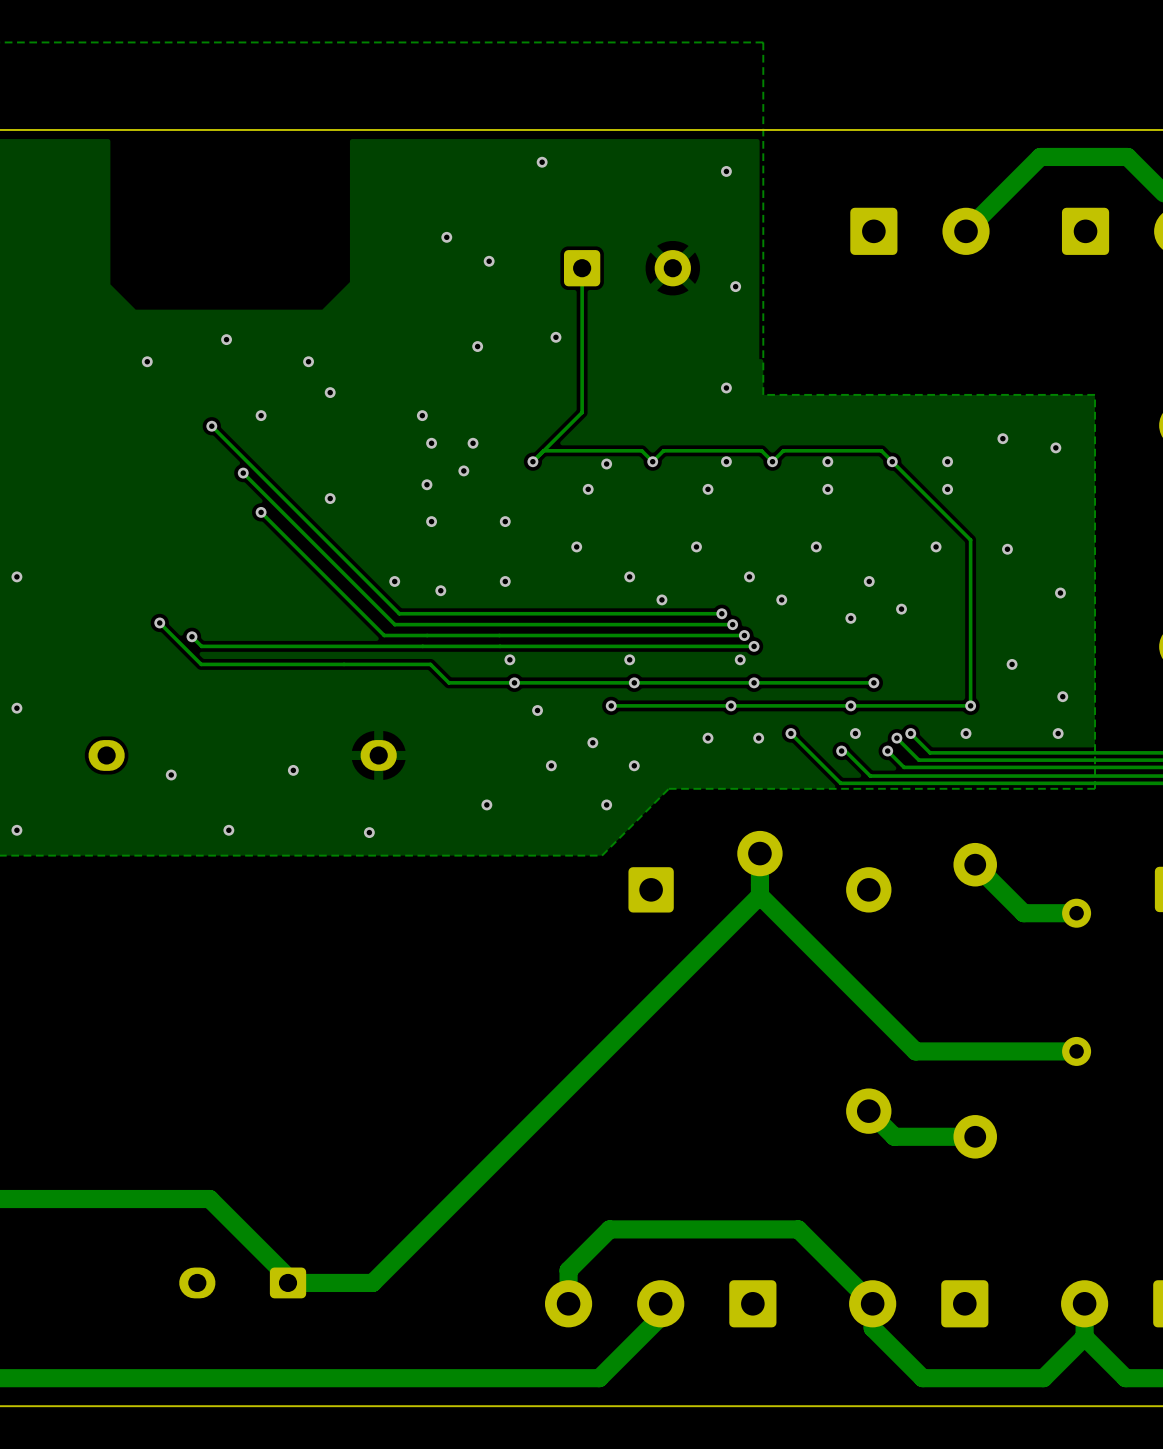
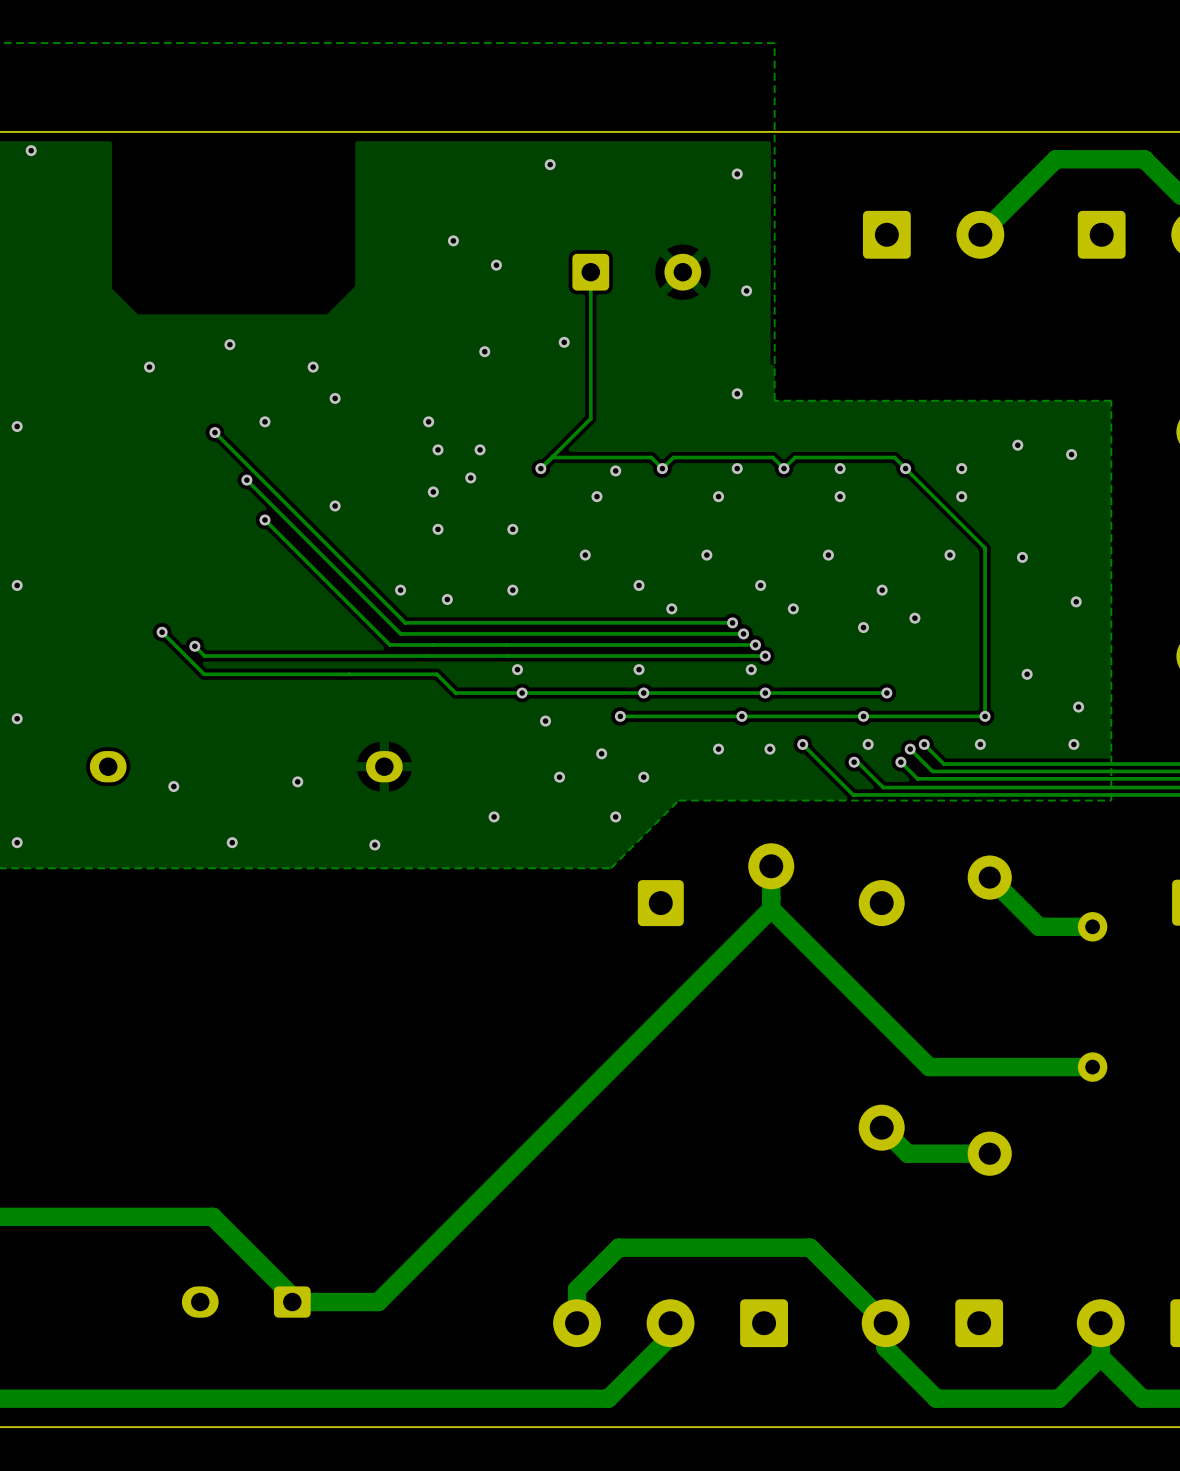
via: none -> (31, 150)
via: none -> (17, 426)

